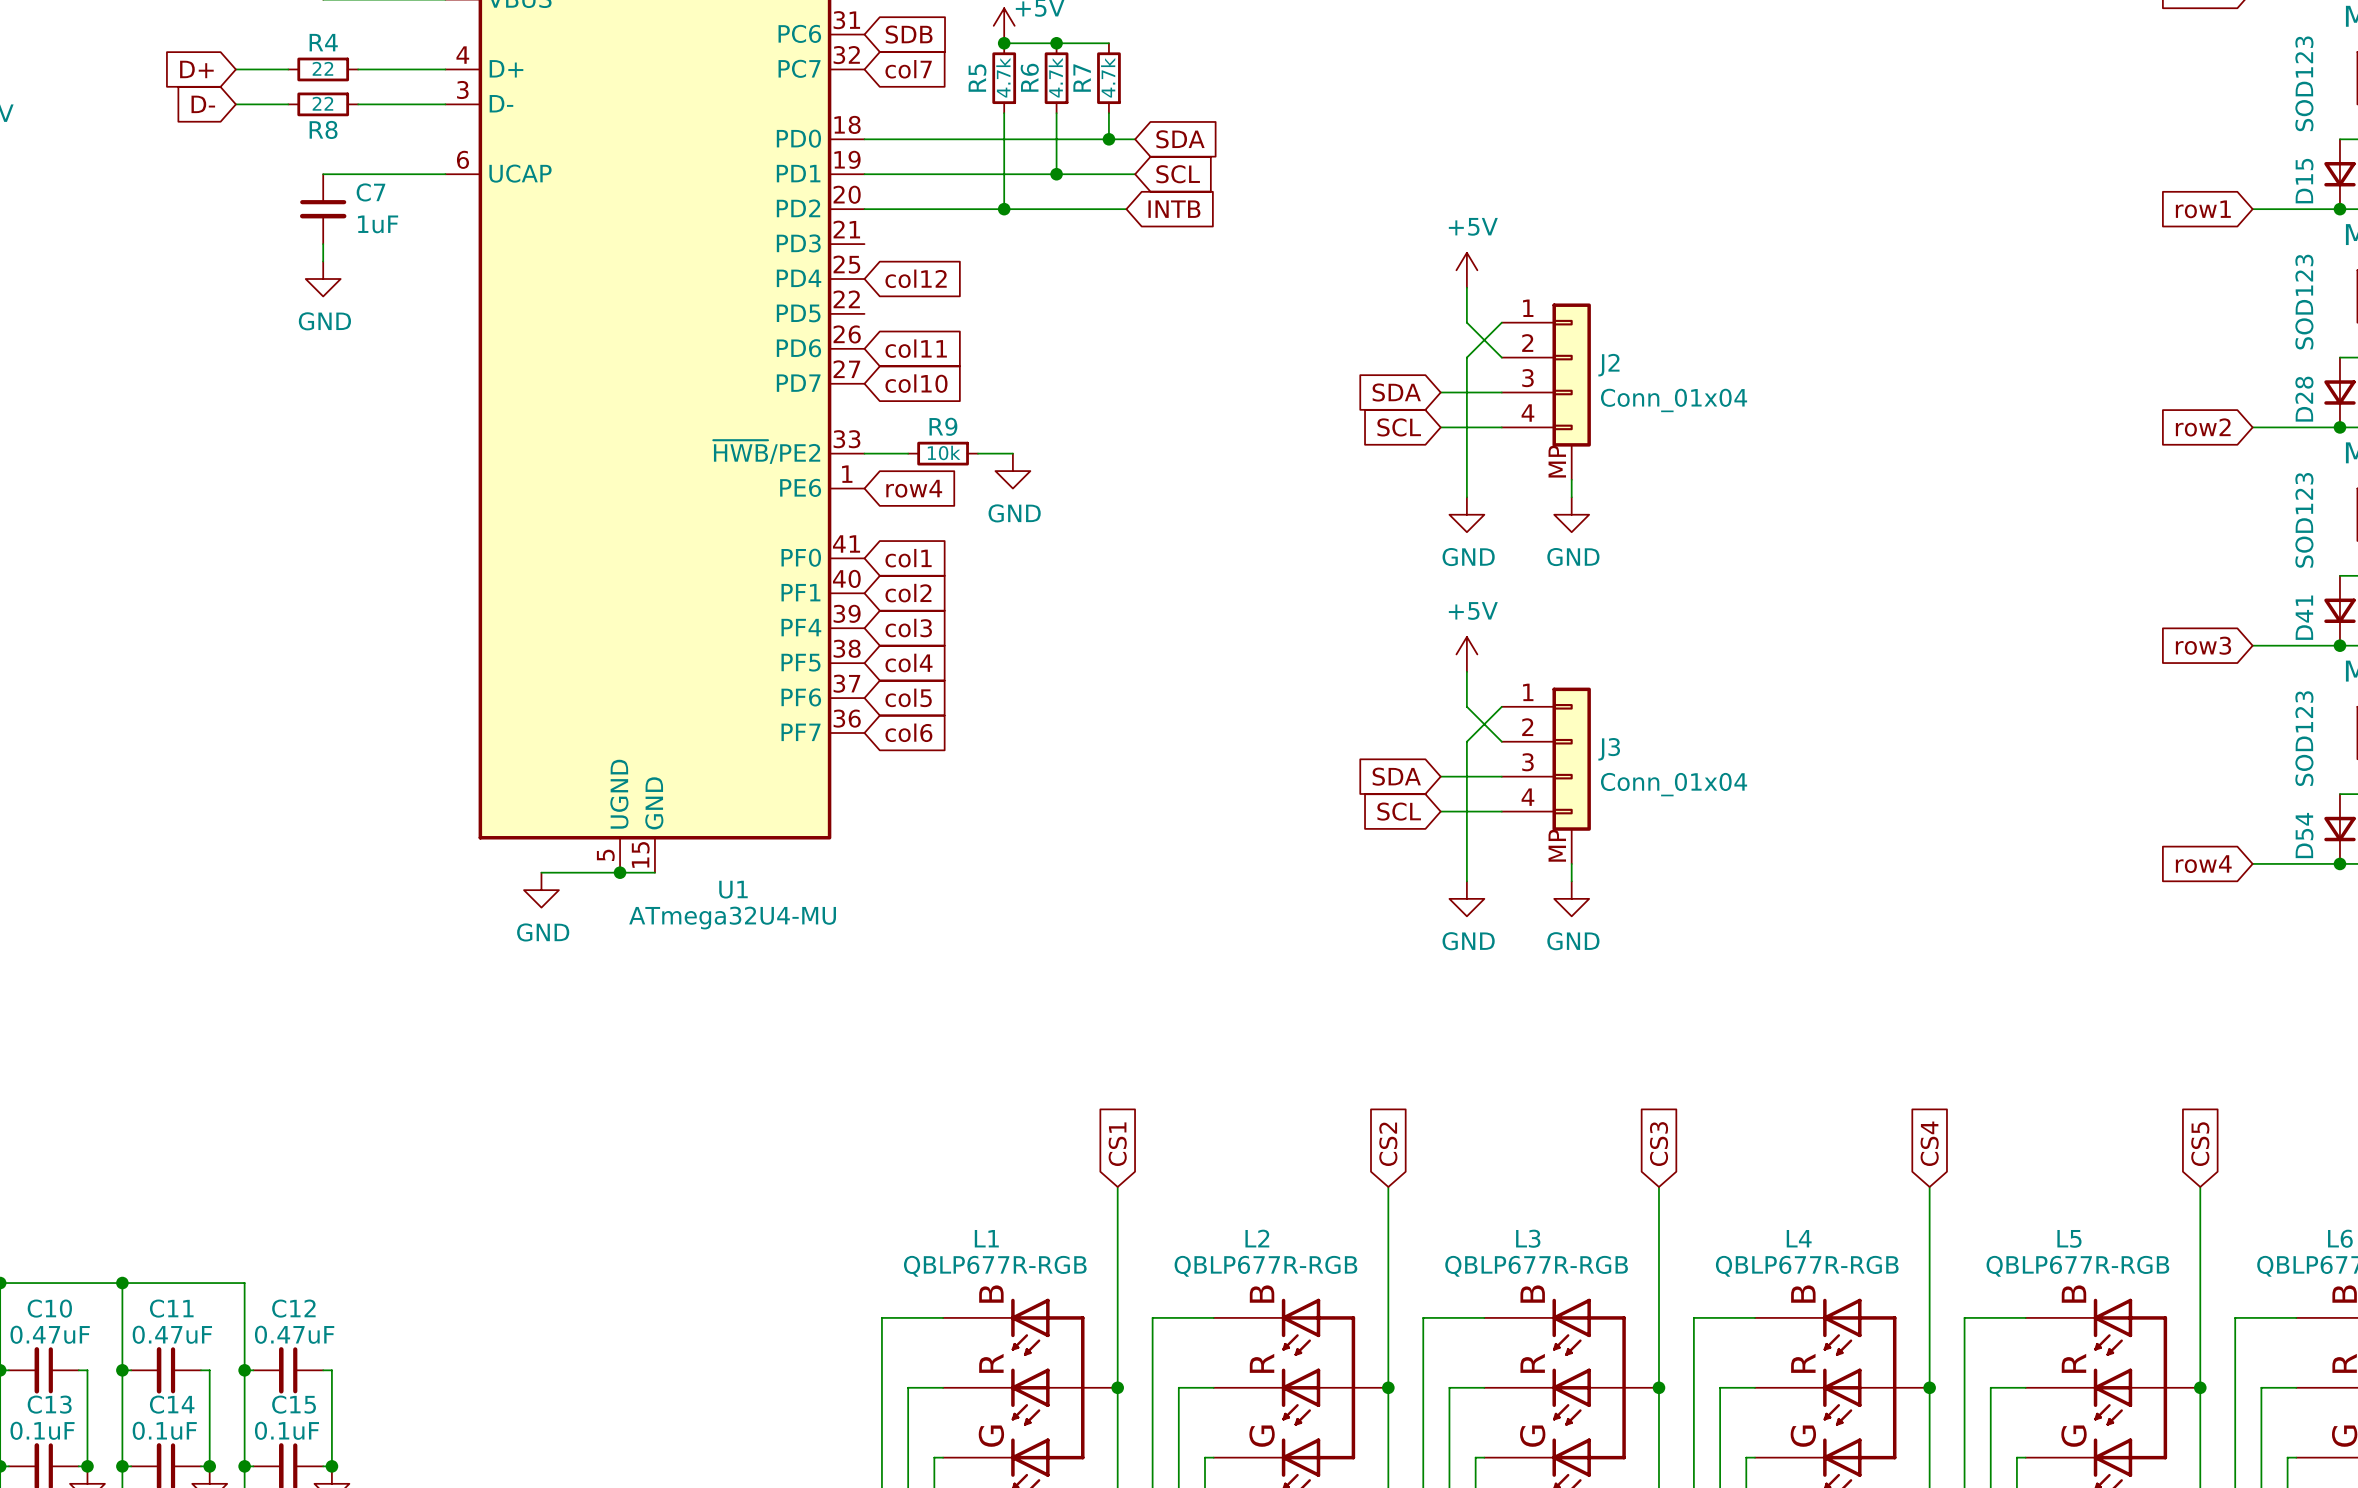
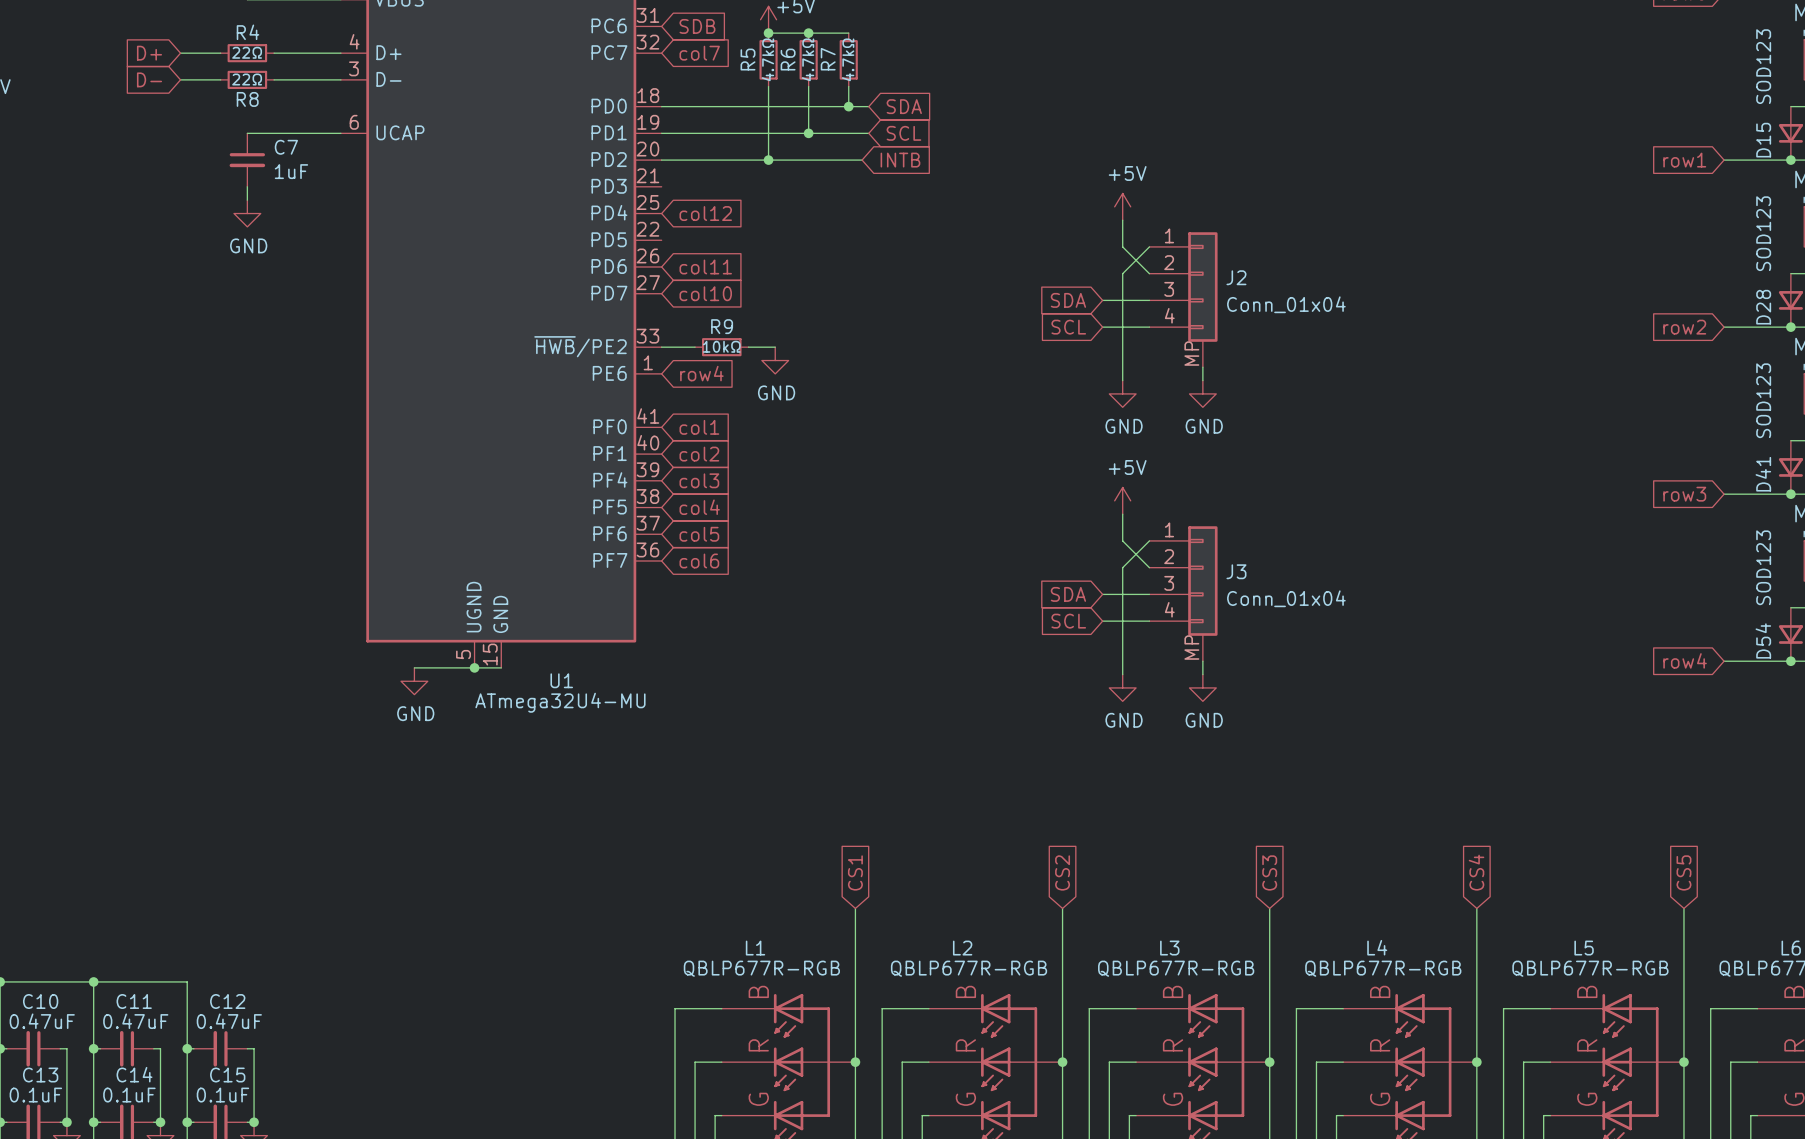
R4 value: 22 (322, 68) -> 22Ω (247, 52)
R5 value: 4.7k (1003, 77) -> 4.7kΩ (767, 59)
R6 value: 4.7k (1055, 77) -> 4.7kΩ (808, 59)
R7 value: 4.7k (1108, 77) -> 4.7kΩ (848, 59)
R8 value: 22 (322, 103) -> 22Ω (247, 79)
R9 value: 10k (944, 452) -> 10kΩ (721, 346)

